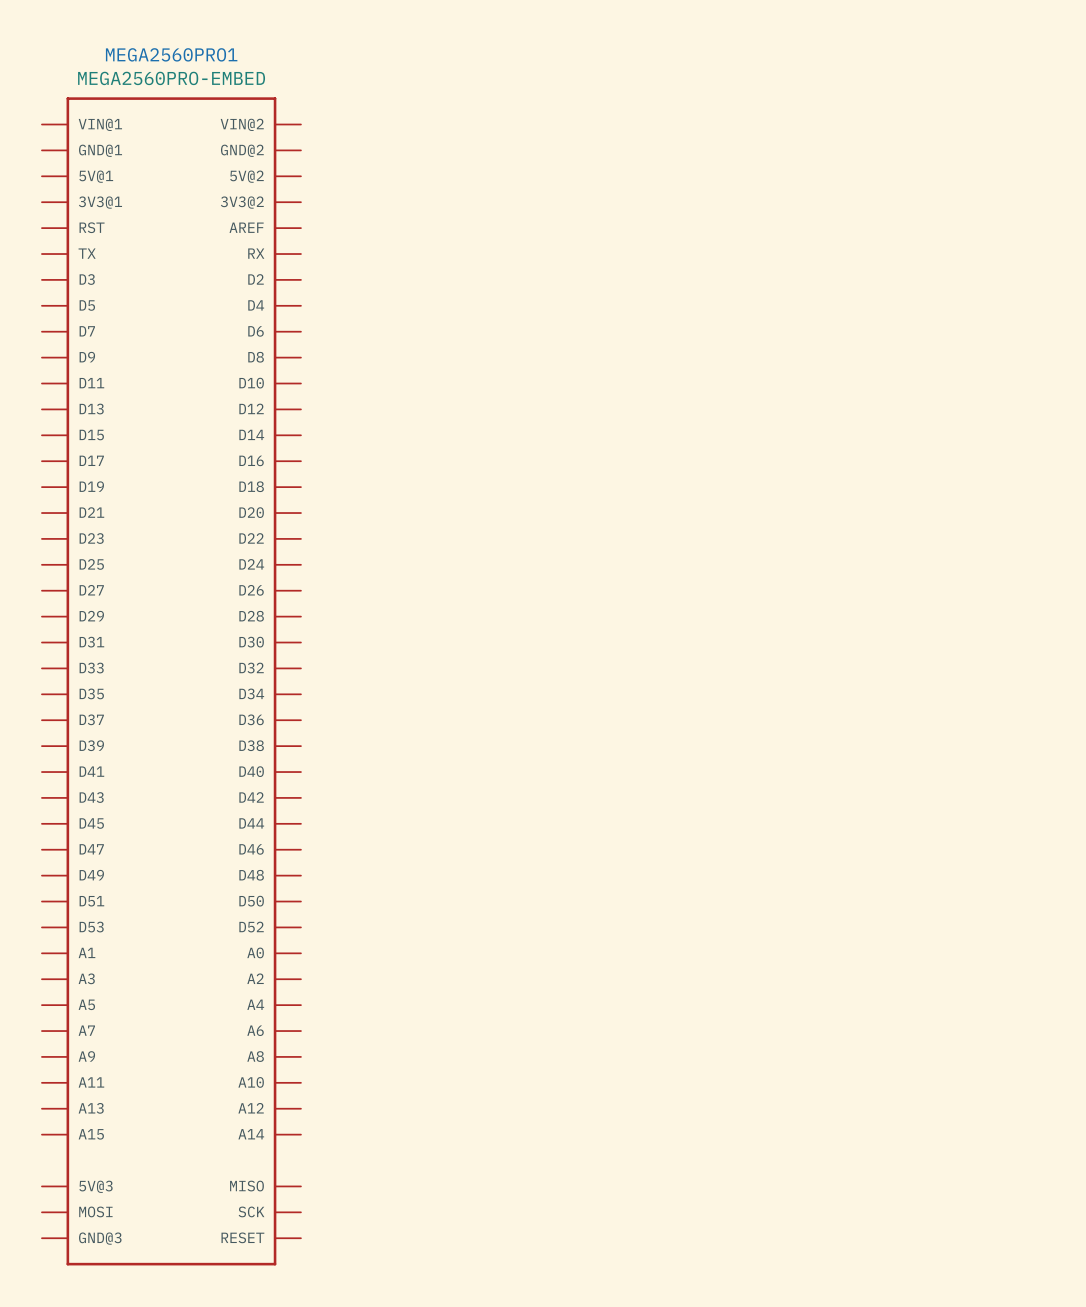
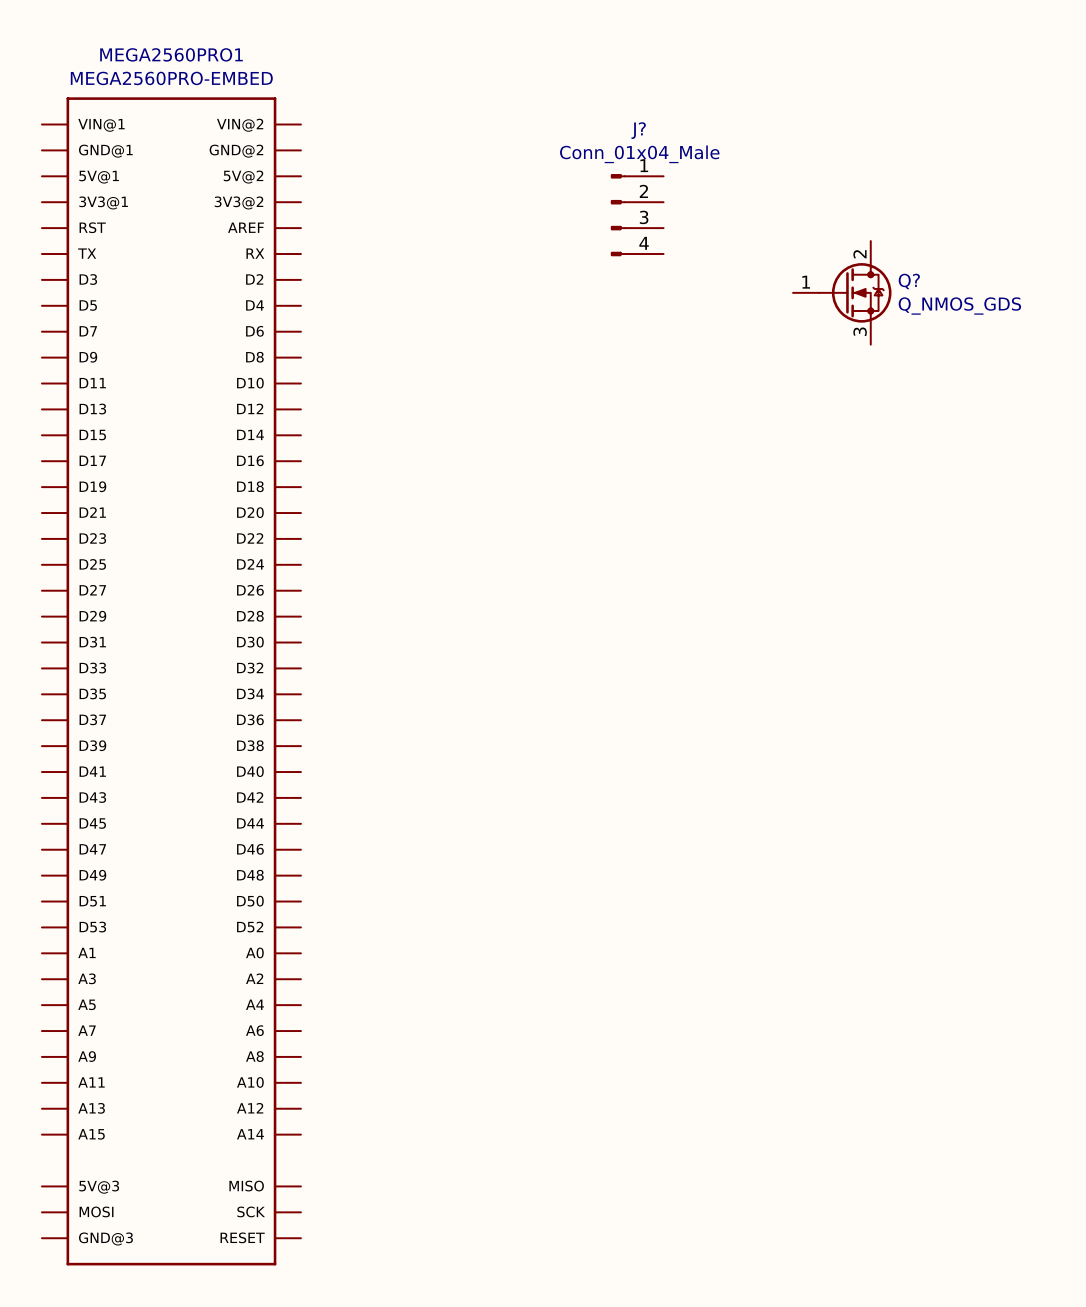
J?: none -> Conn_01x04_Male (637, 215)
Q?: none -> Q_NMOS_GDS (842, 292)

